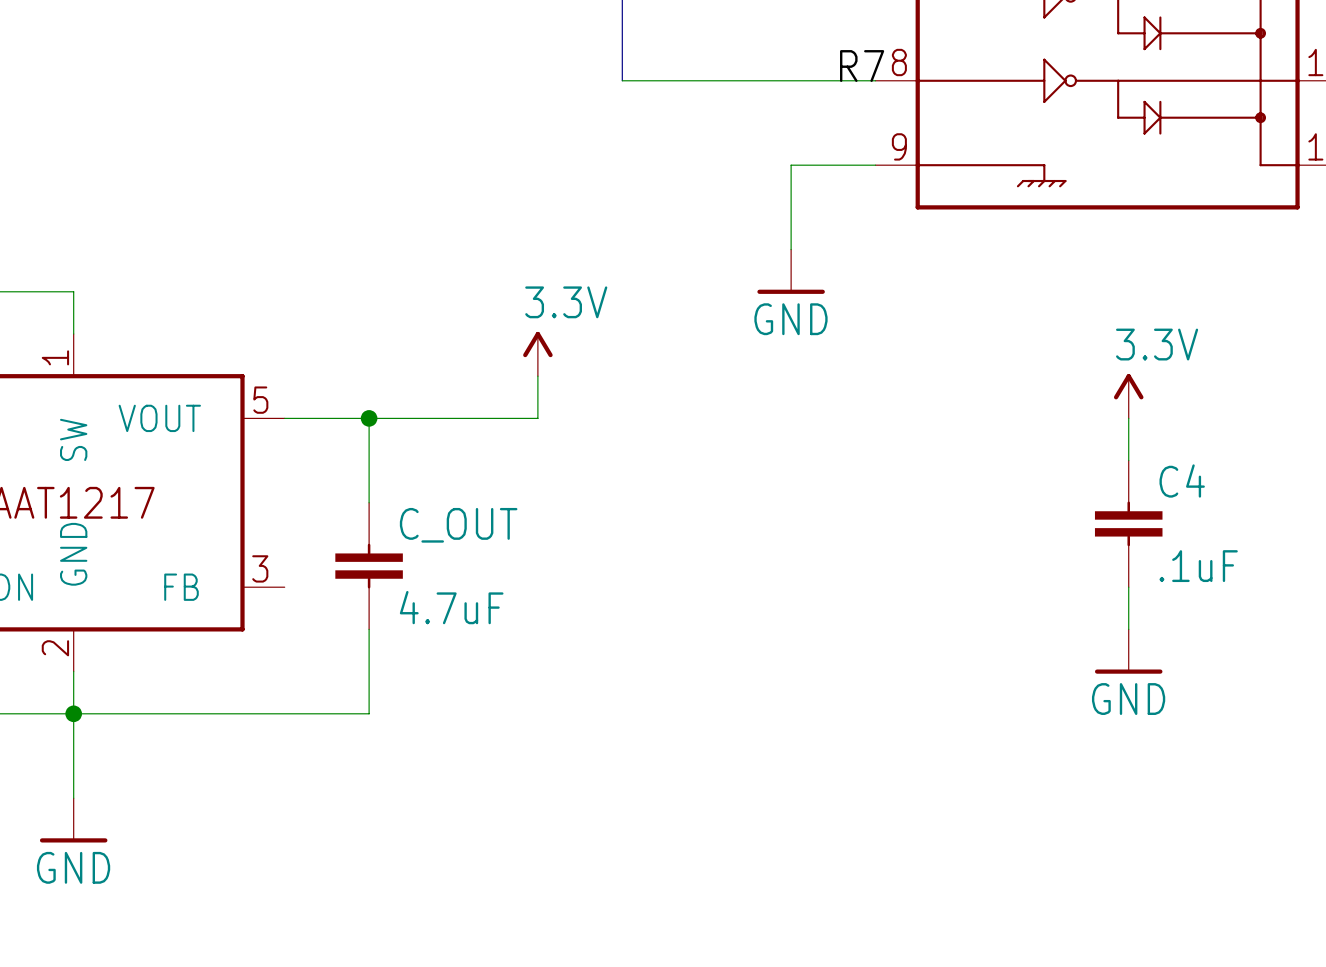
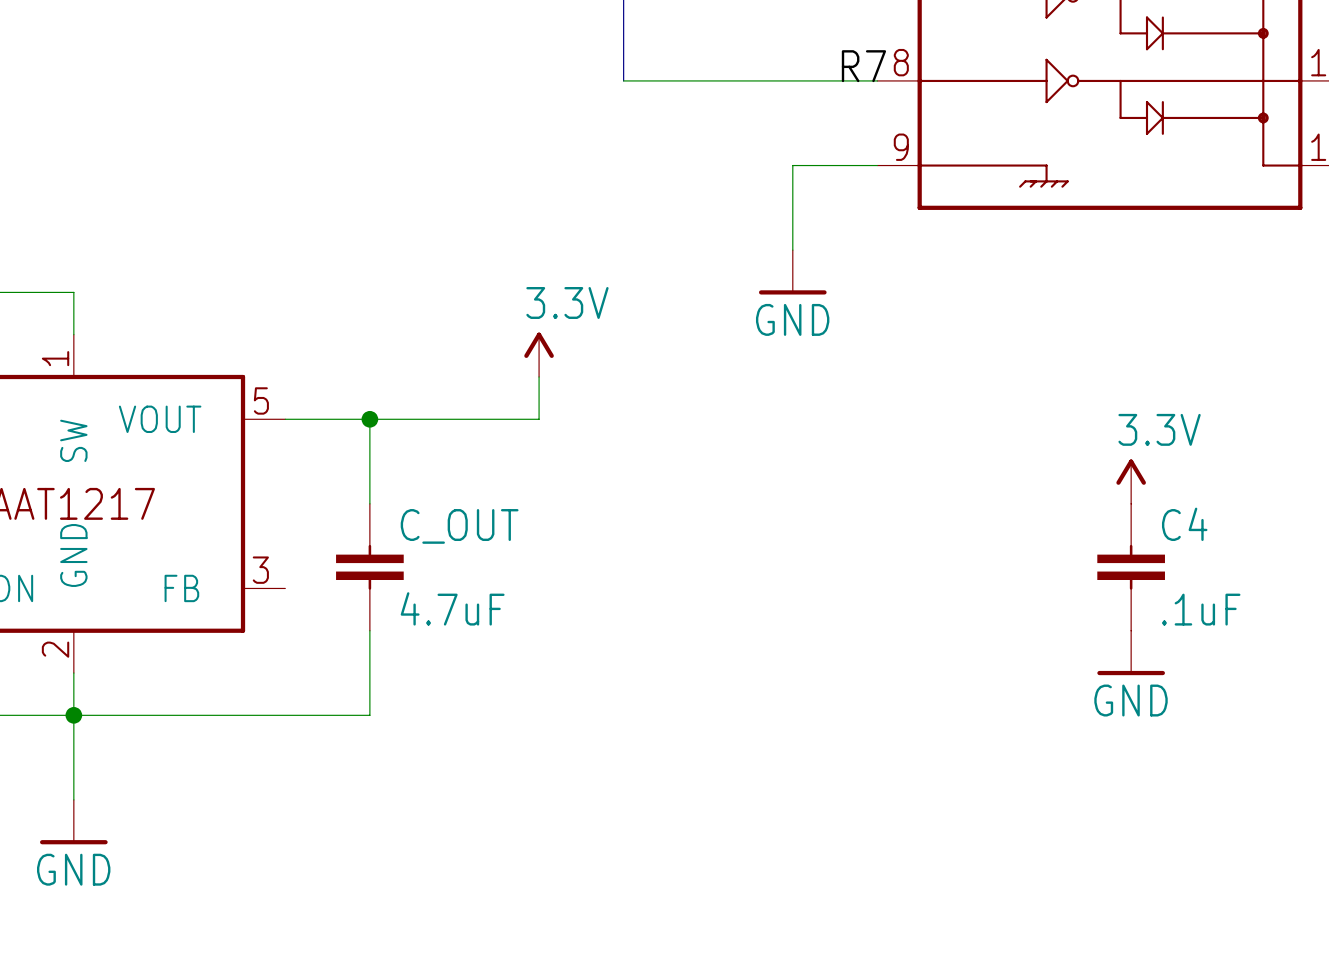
power symbol position: 3.3V (1128, 396) -> 3.3V (1131, 481)
wire: (1128, 418) (1128, 460) -> none
C4 position: (1128, 523) -> (1131, 567)

